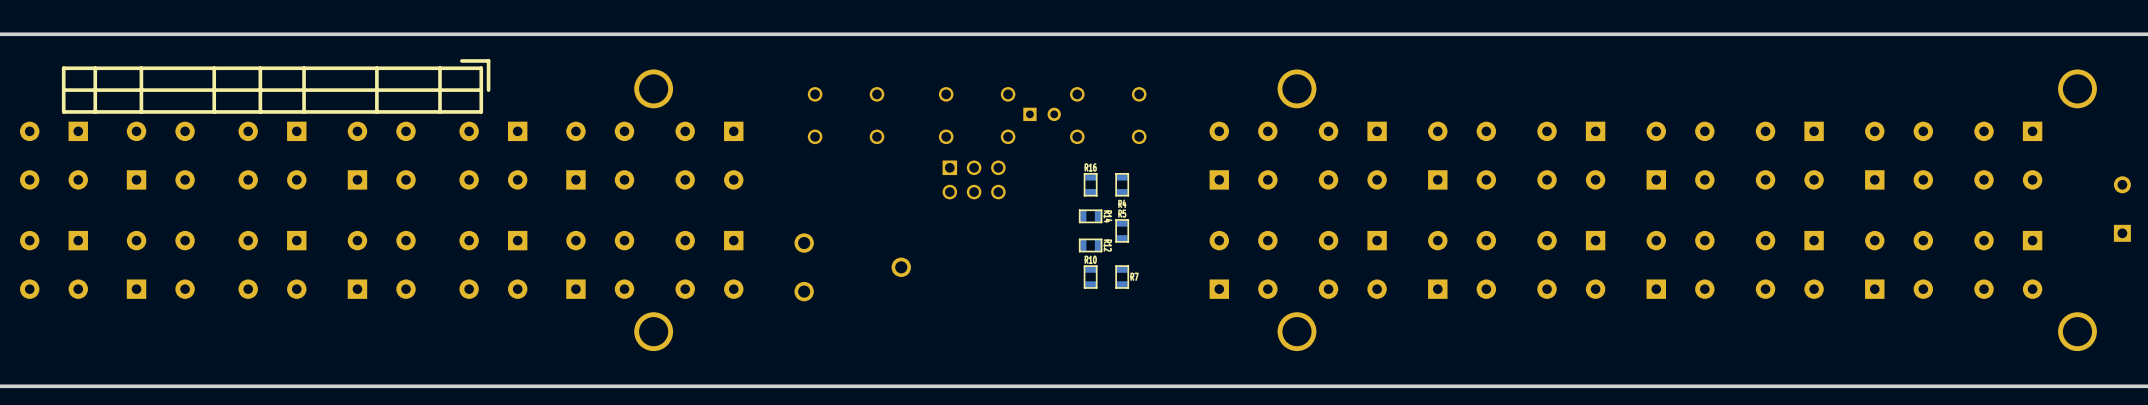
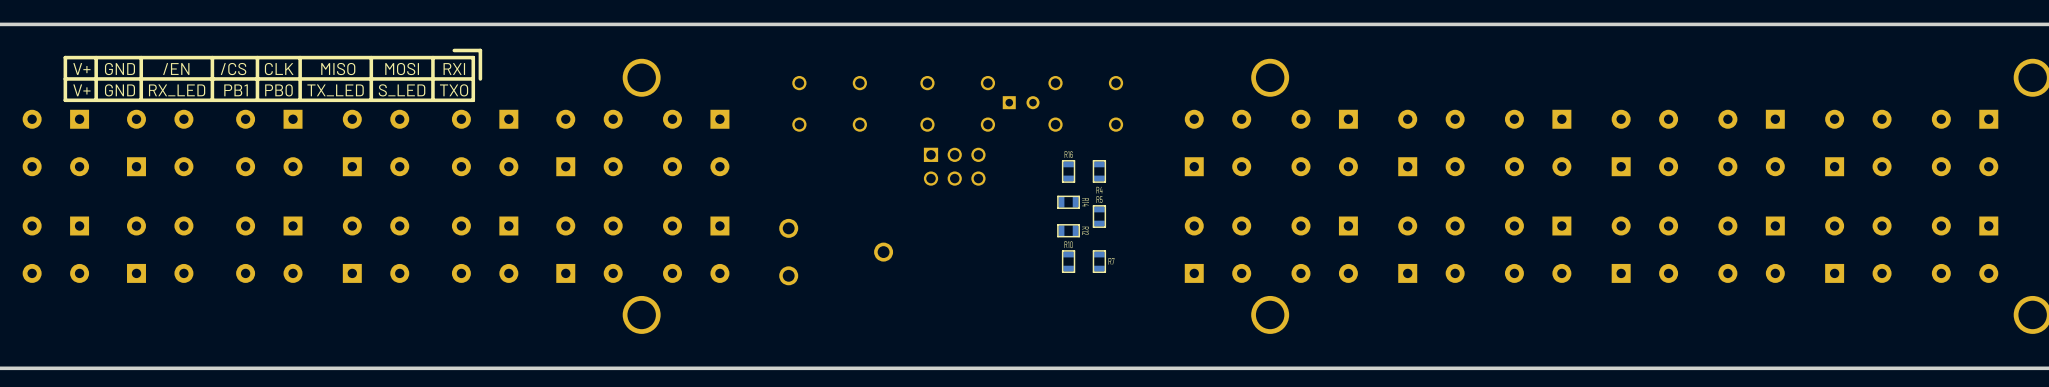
text: none -> V+ (81, 69)
text: none -> GND (119, 69)
text: none -> CLK (279, 69)
text: none -> MISO (338, 69)
text: none -> MOSI (402, 69)
text: none -> RXI (454, 69)
text: none -> /EN (176, 69)
text: none -> /CS (233, 69)
text: none -> V+ (81, 90)
text: none -> GND (119, 90)
text: none -> PB1 (236, 90)
text: none -> PB0 (278, 90)
text: none -> TXO (454, 90)
text: none -> RX_LED (177, 90)
text: none -> TX_LED (335, 90)
text: none -> S_LED (402, 90)

